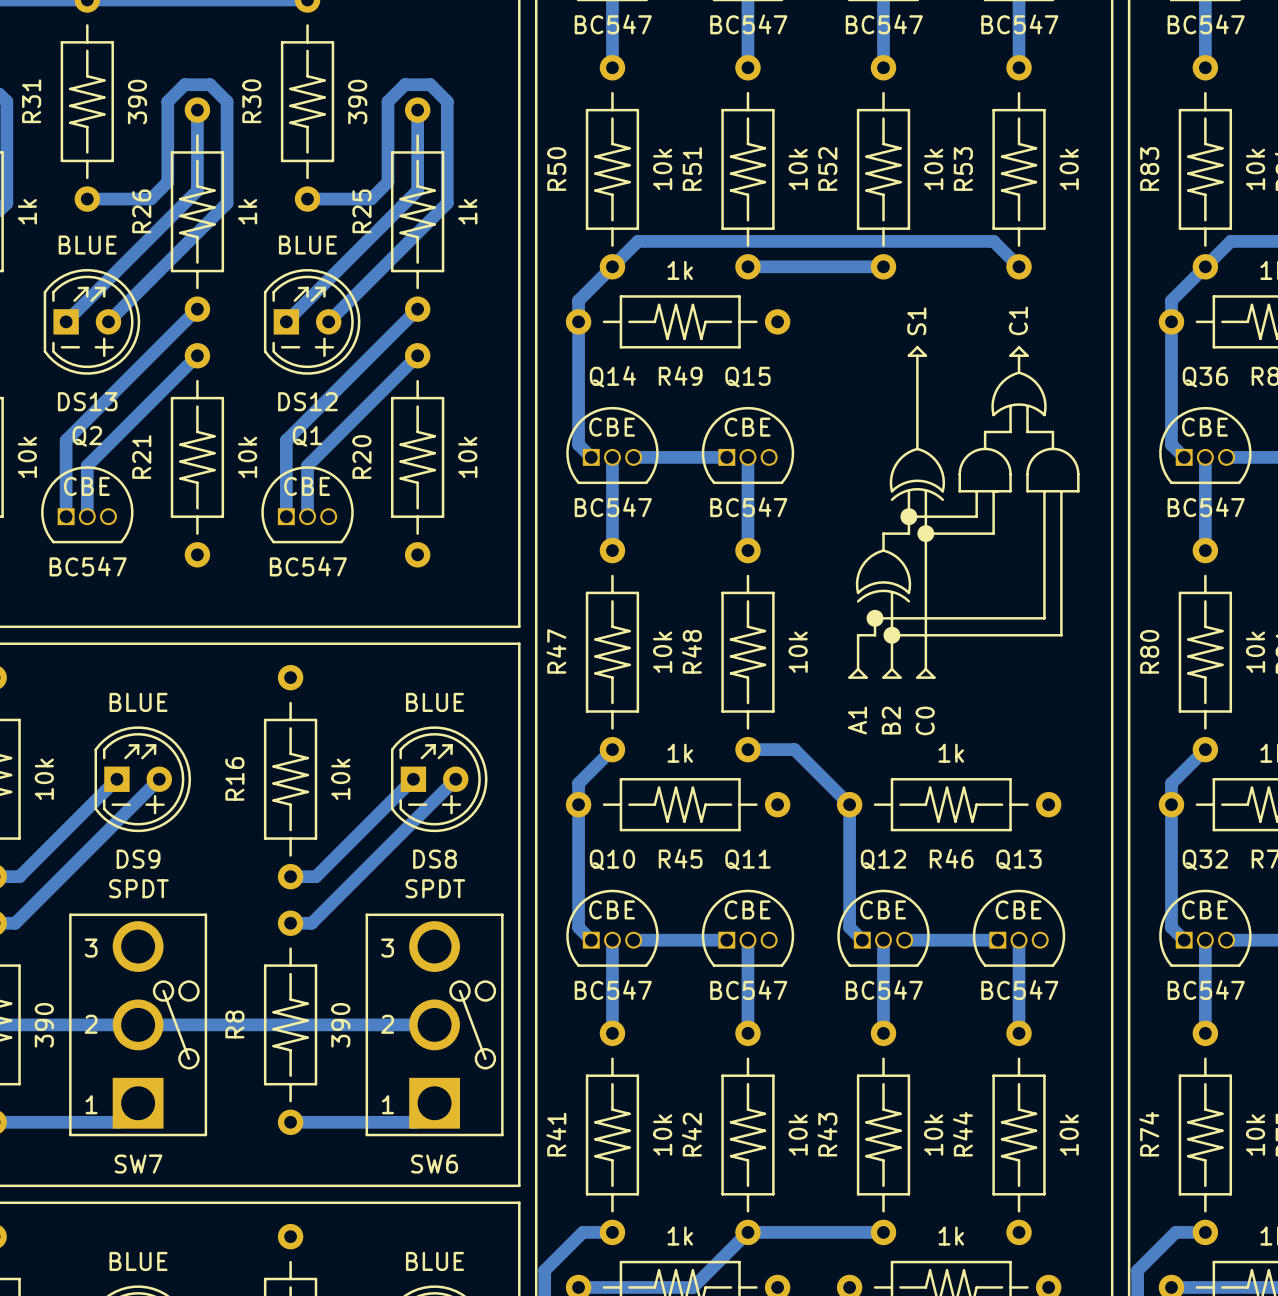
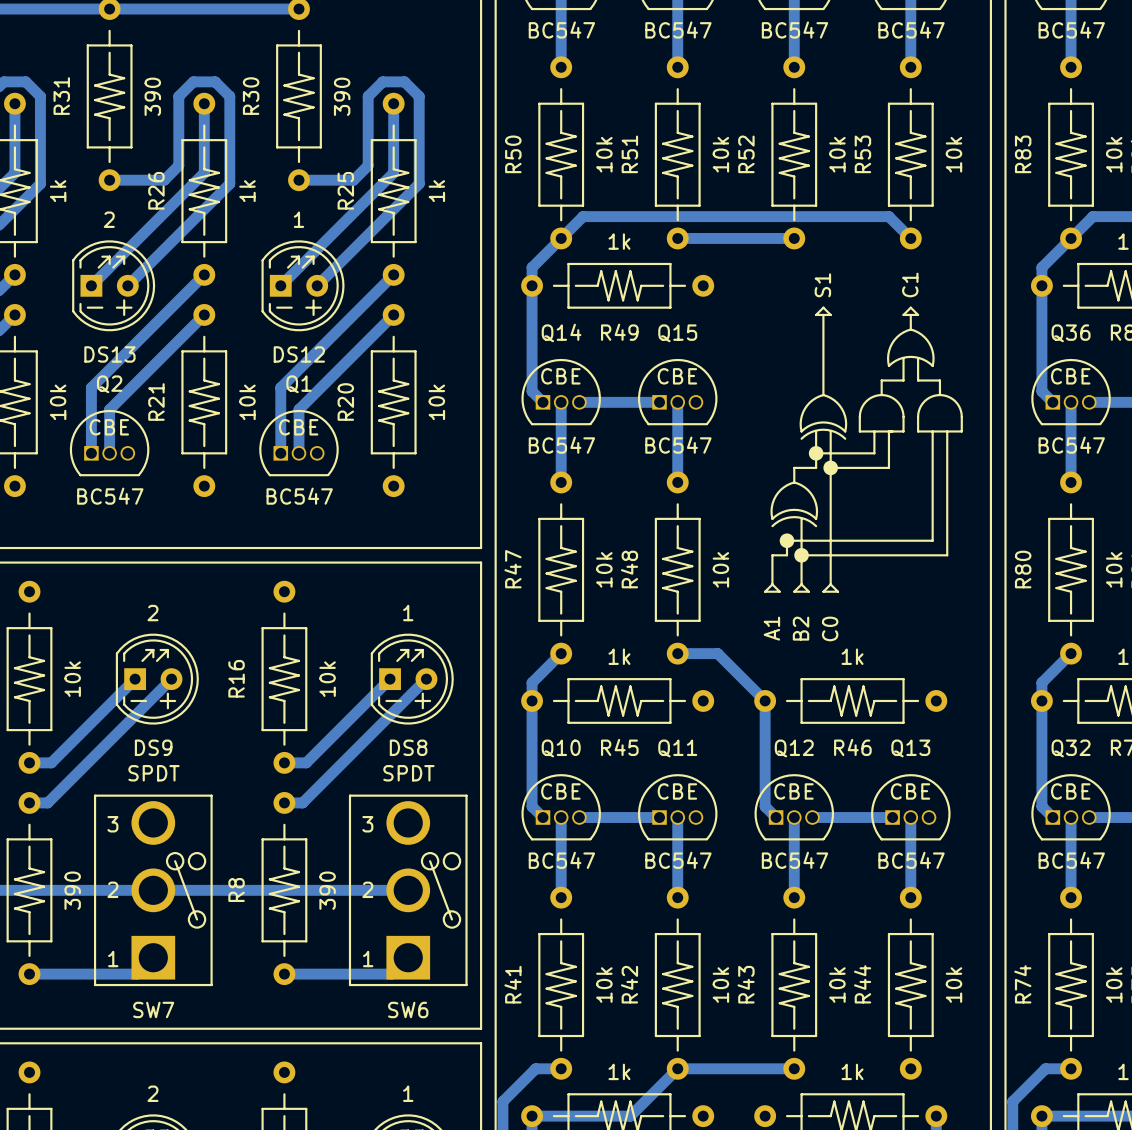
DS13 value: BLUE (87, 245) -> 2 (109, 219)
DS12 value: BLUE (307, 245) -> 1 (298, 219)
DS9 value: BLUE (138, 702) -> 2 (152, 613)
DS8 value: BLUE (434, 702) -> 1 (408, 613)
part value: BLUE (138, 1261) -> 2 (152, 1093)
part value: BLUE (434, 1261) -> 1 (408, 1093)

